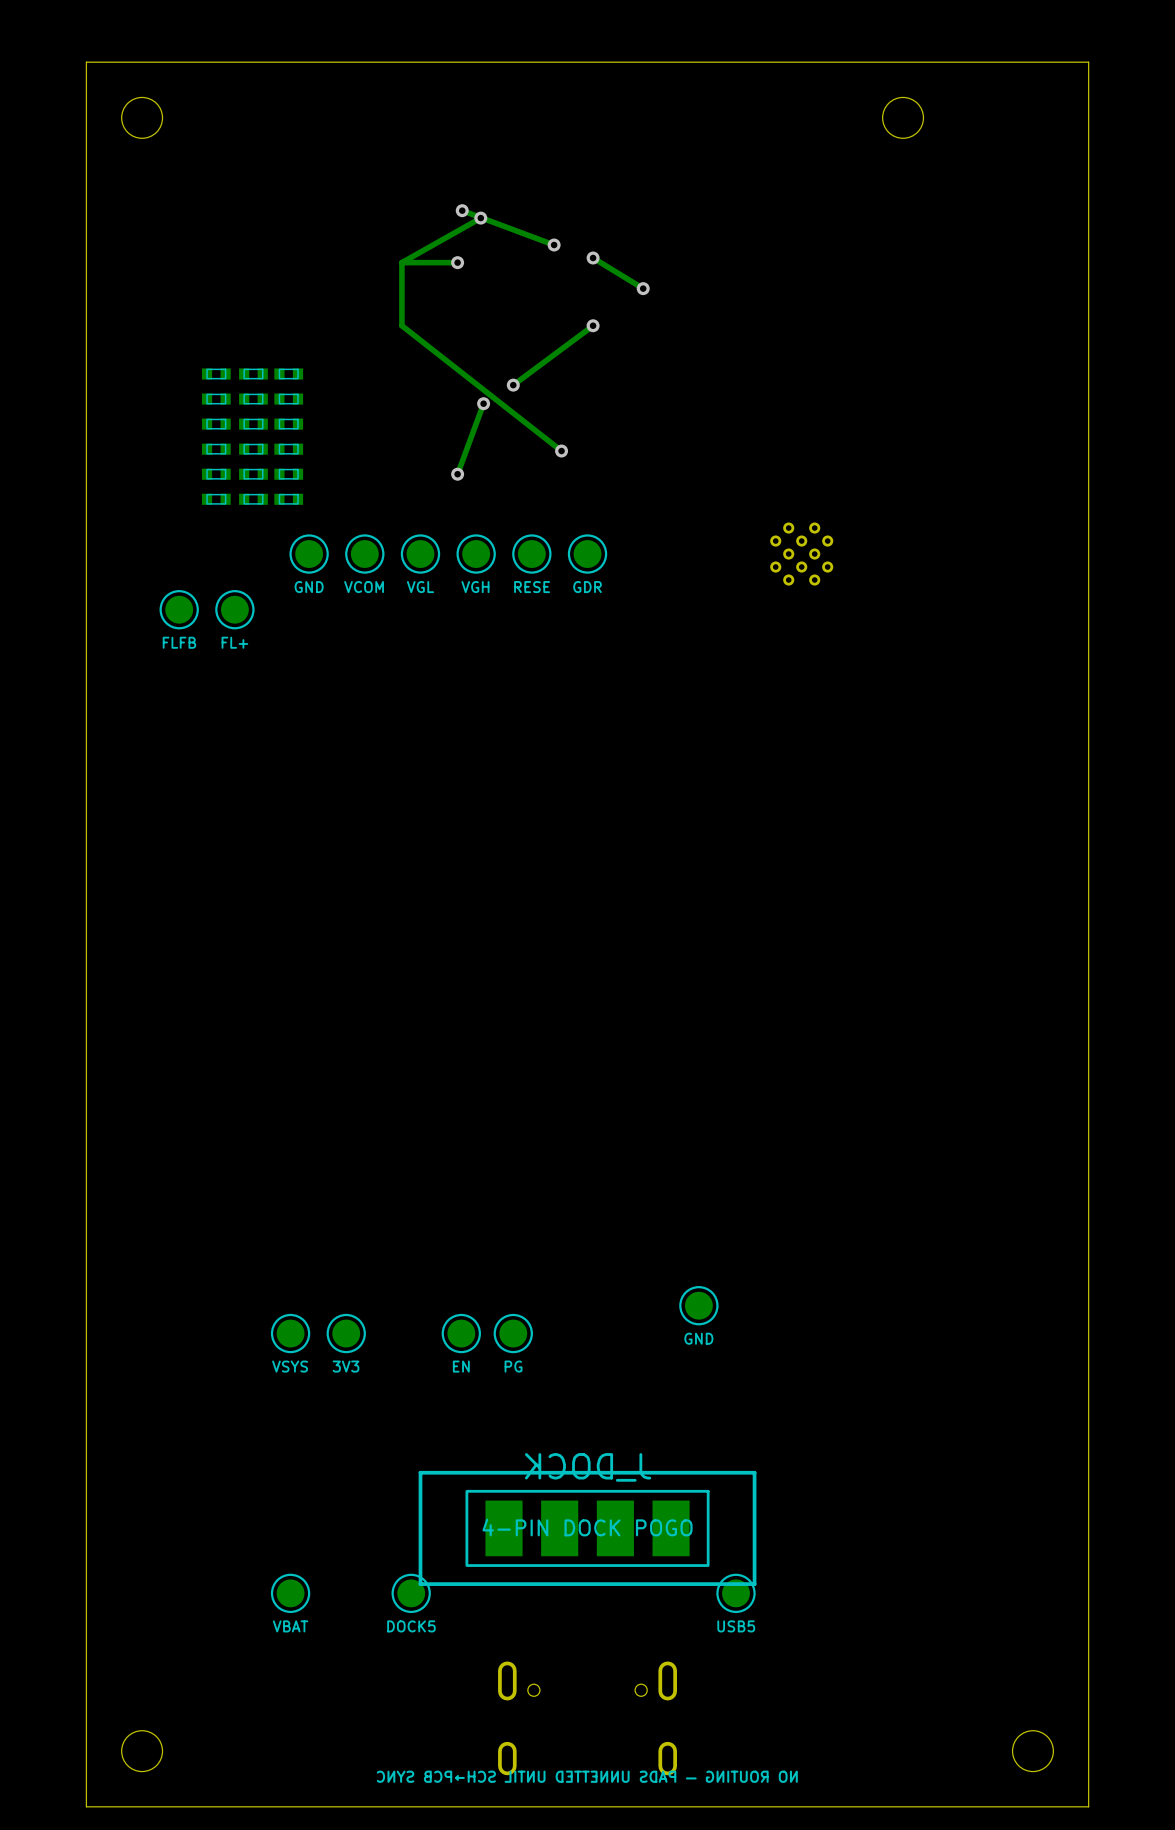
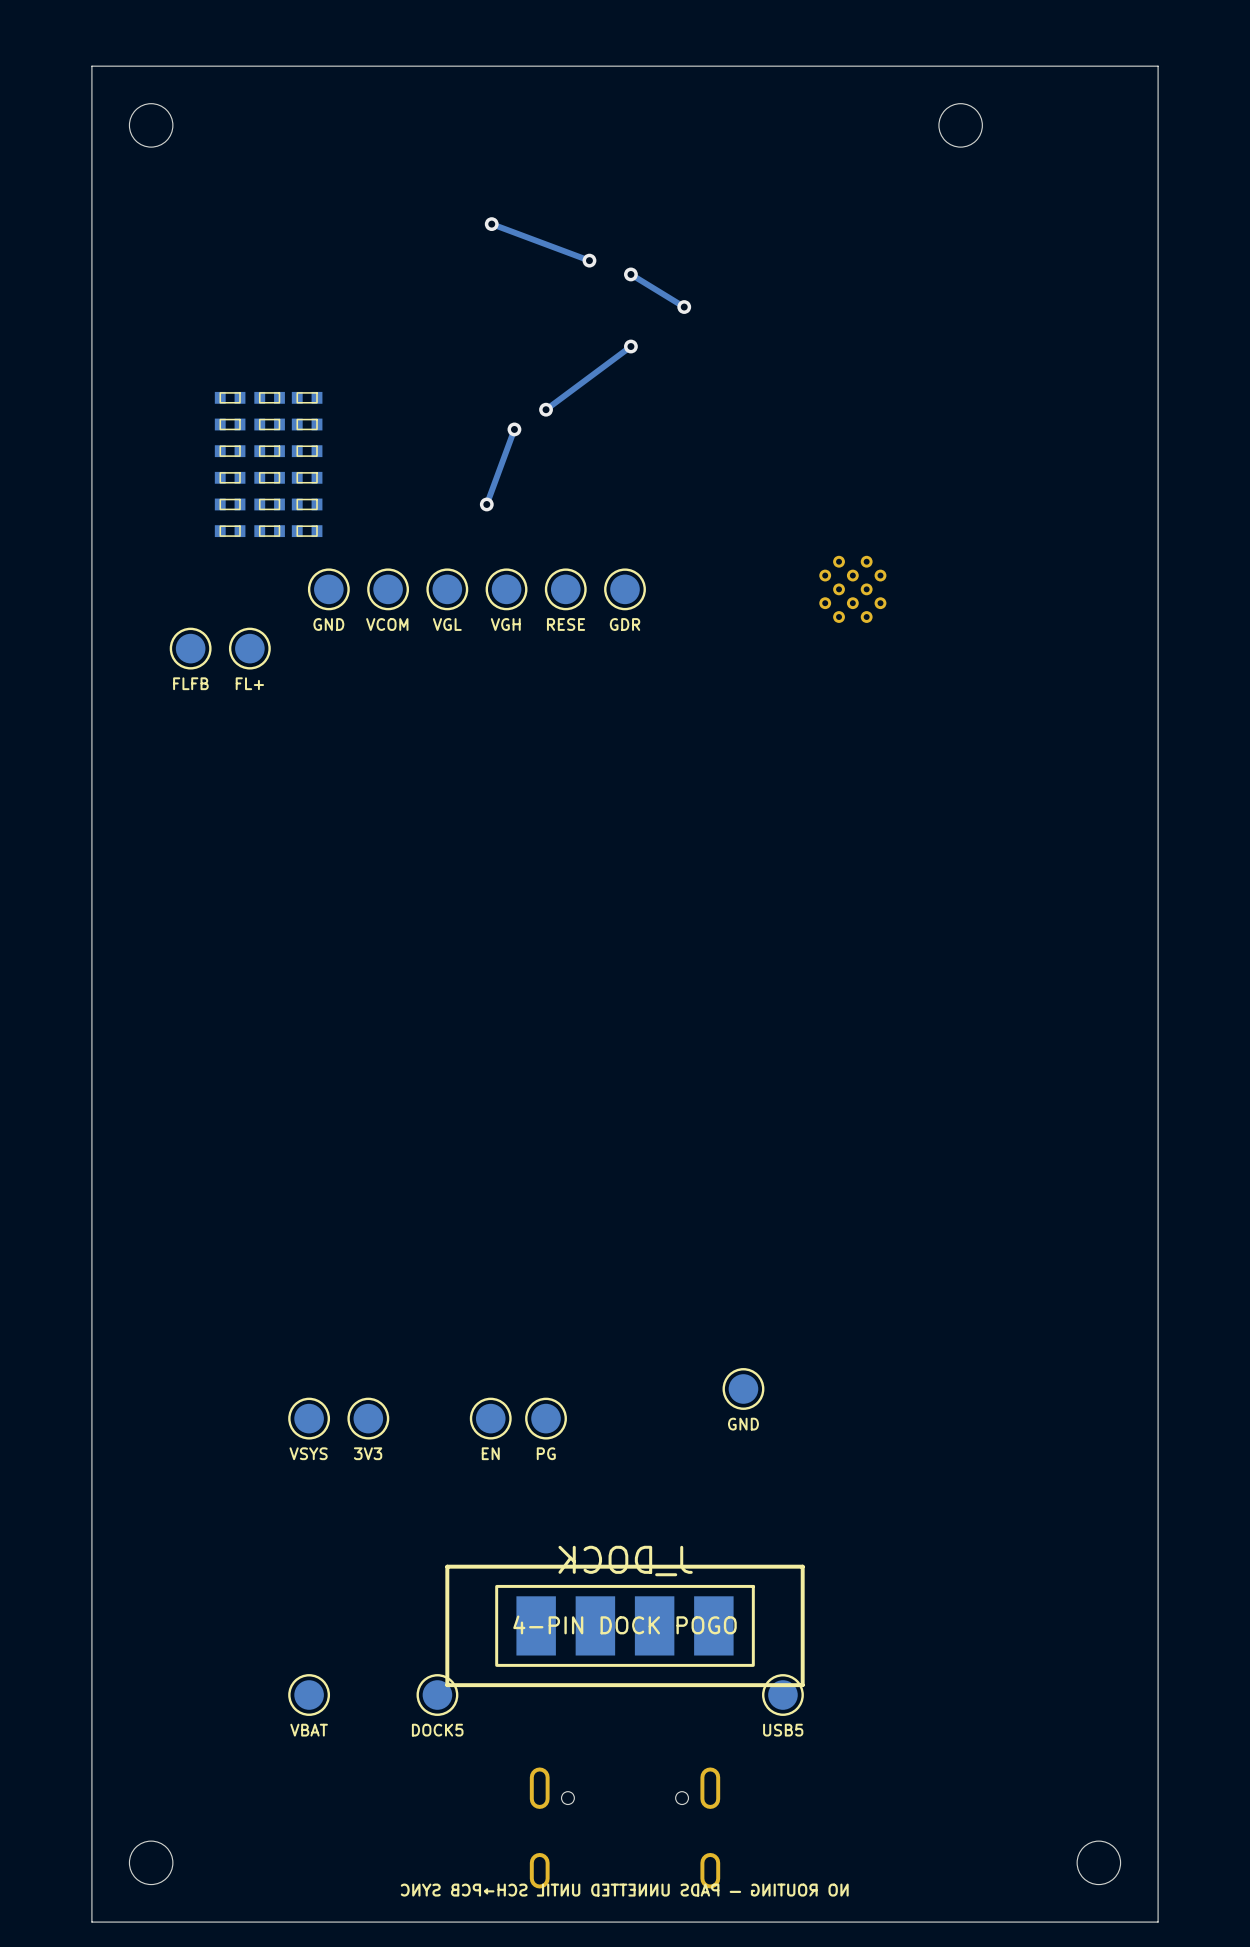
track: (480, 218) (401, 262) -> none
via: (480, 218) -> none
track: (401, 262) (401, 325) (561, 451) -> none
track: (457, 262) (401, 262) -> none
via: (457, 262) -> none
via: (561, 451) -> none

